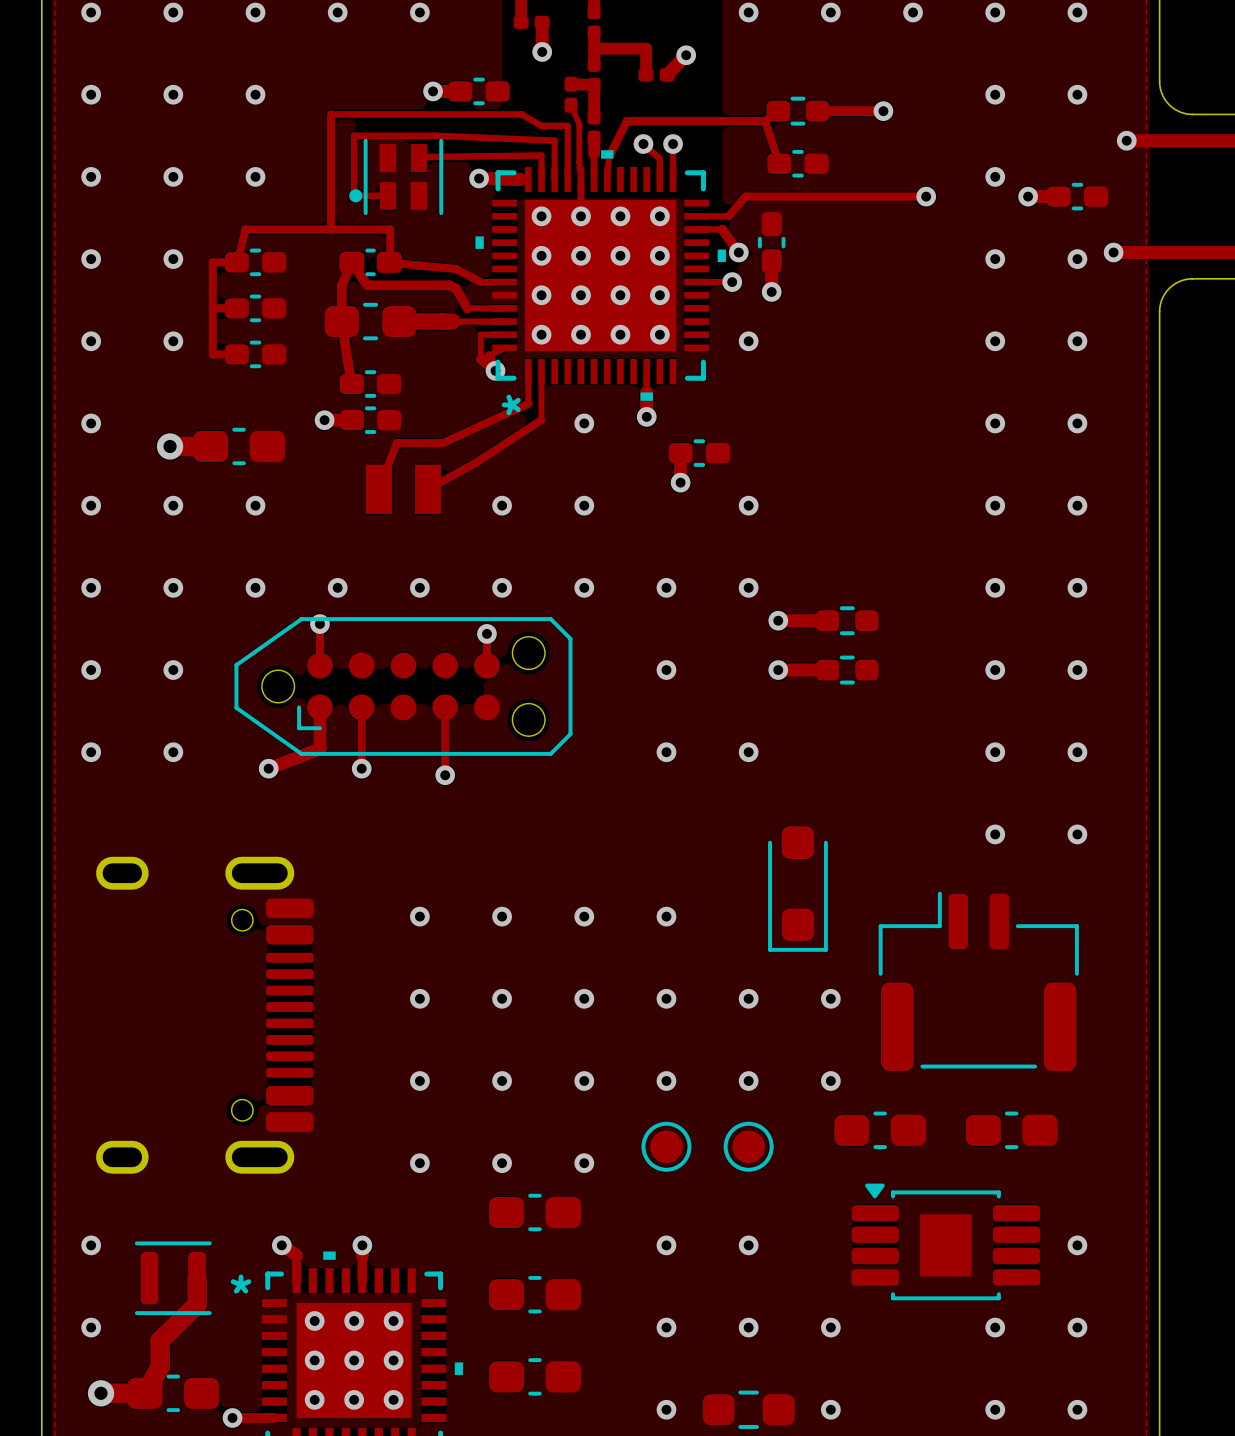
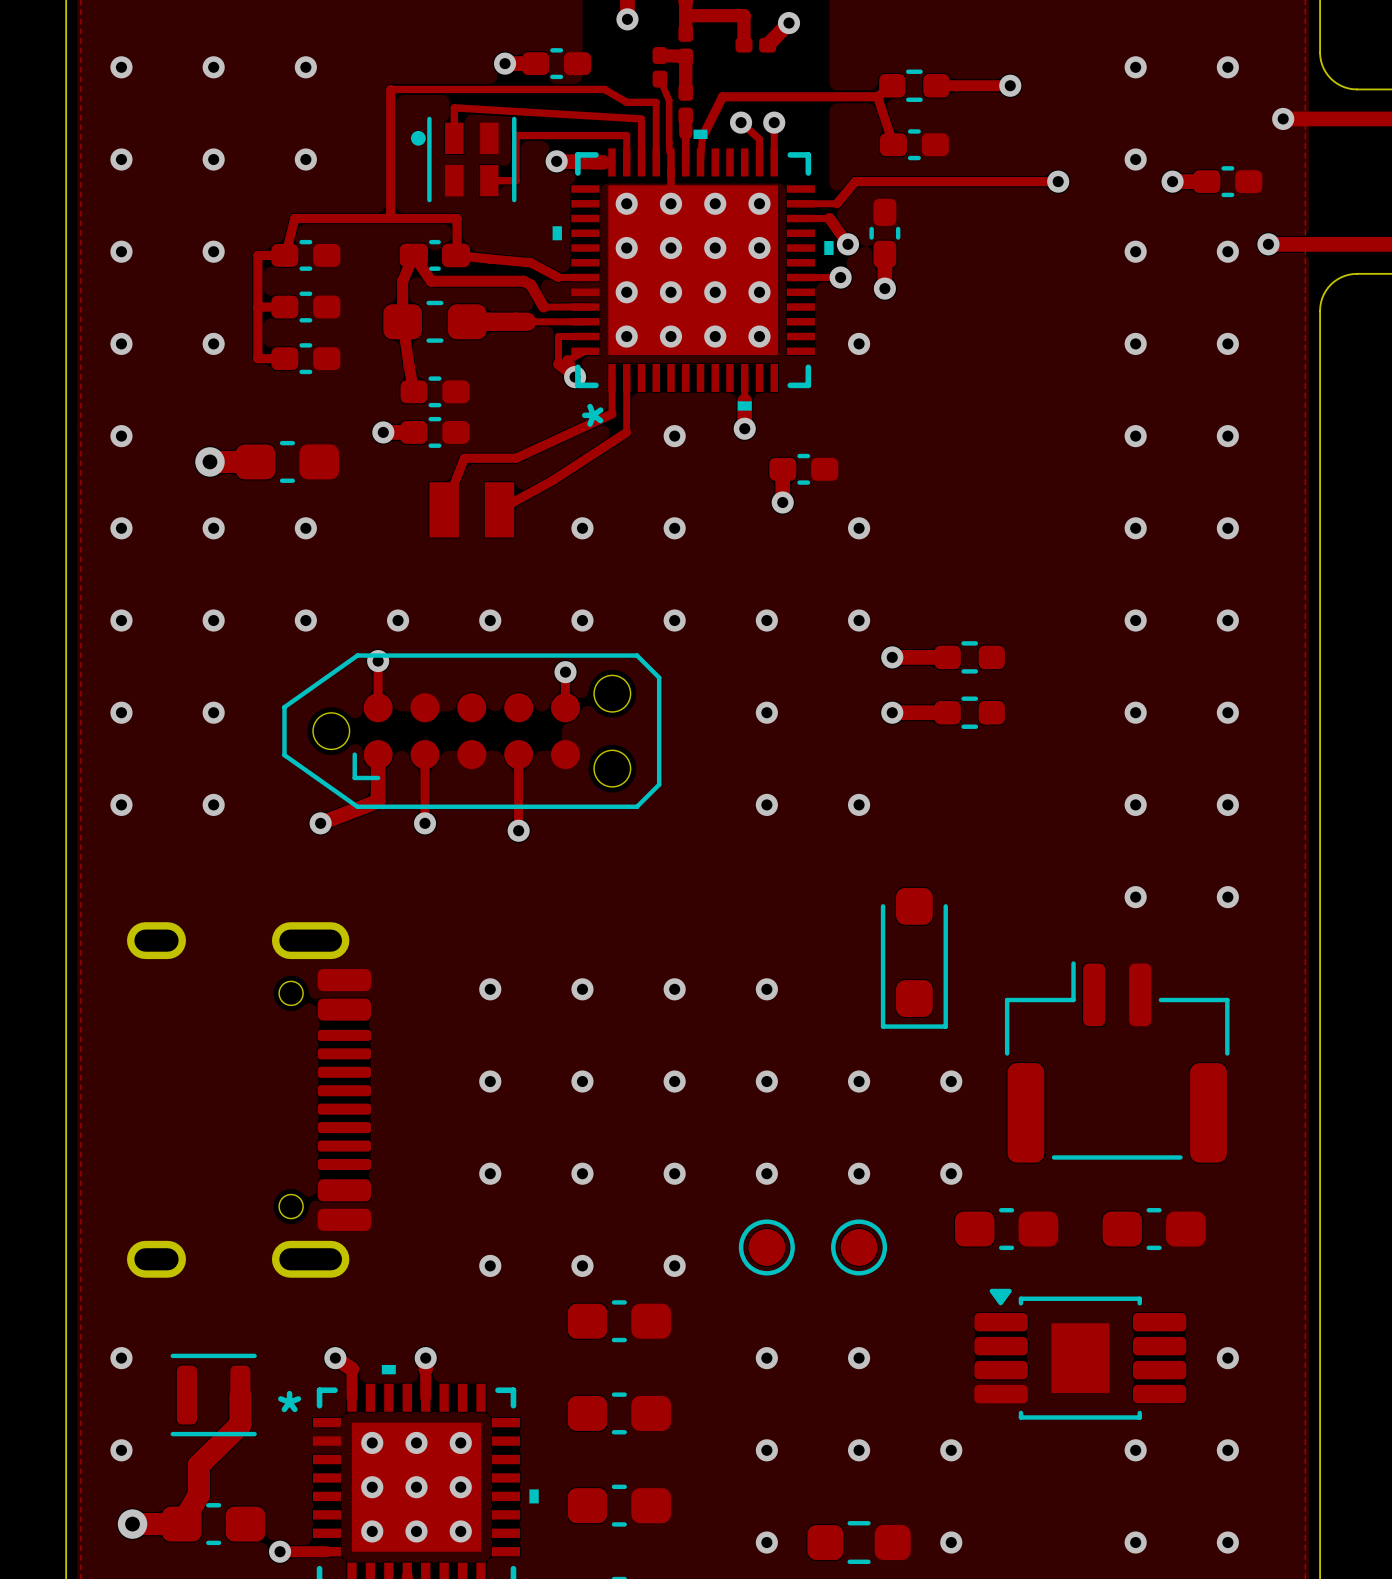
part footprint: [349, 138, 444, 216] -> [410, 116, 517, 203]
track: (554, 140) (436, 135) (354, 135) (354, 195) (387, 195) -> (641, 118) (454, 107) (454, 138)
track: (541, 155) (419, 157) -> (626, 135) (516, 135) (516, 180) (489, 180)

